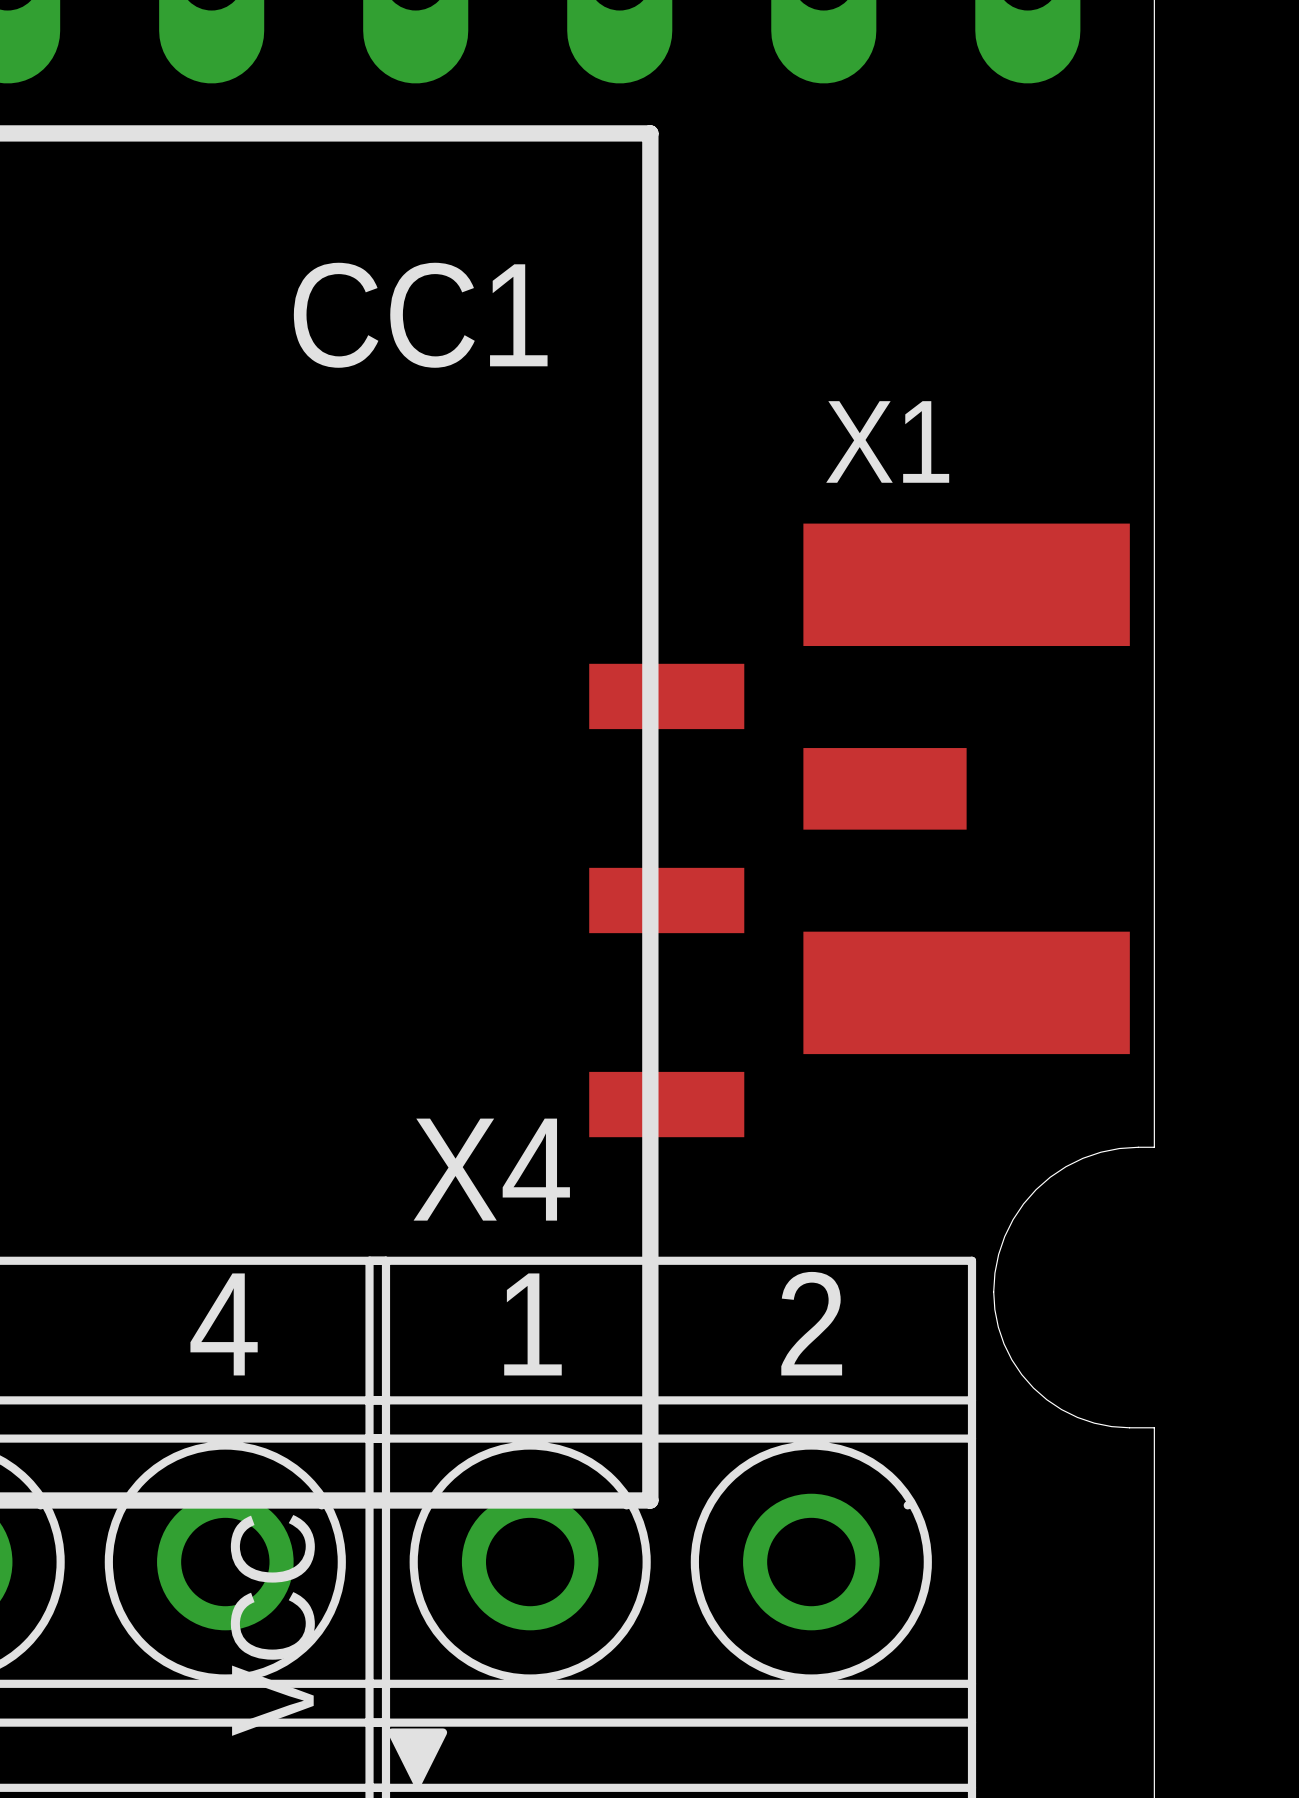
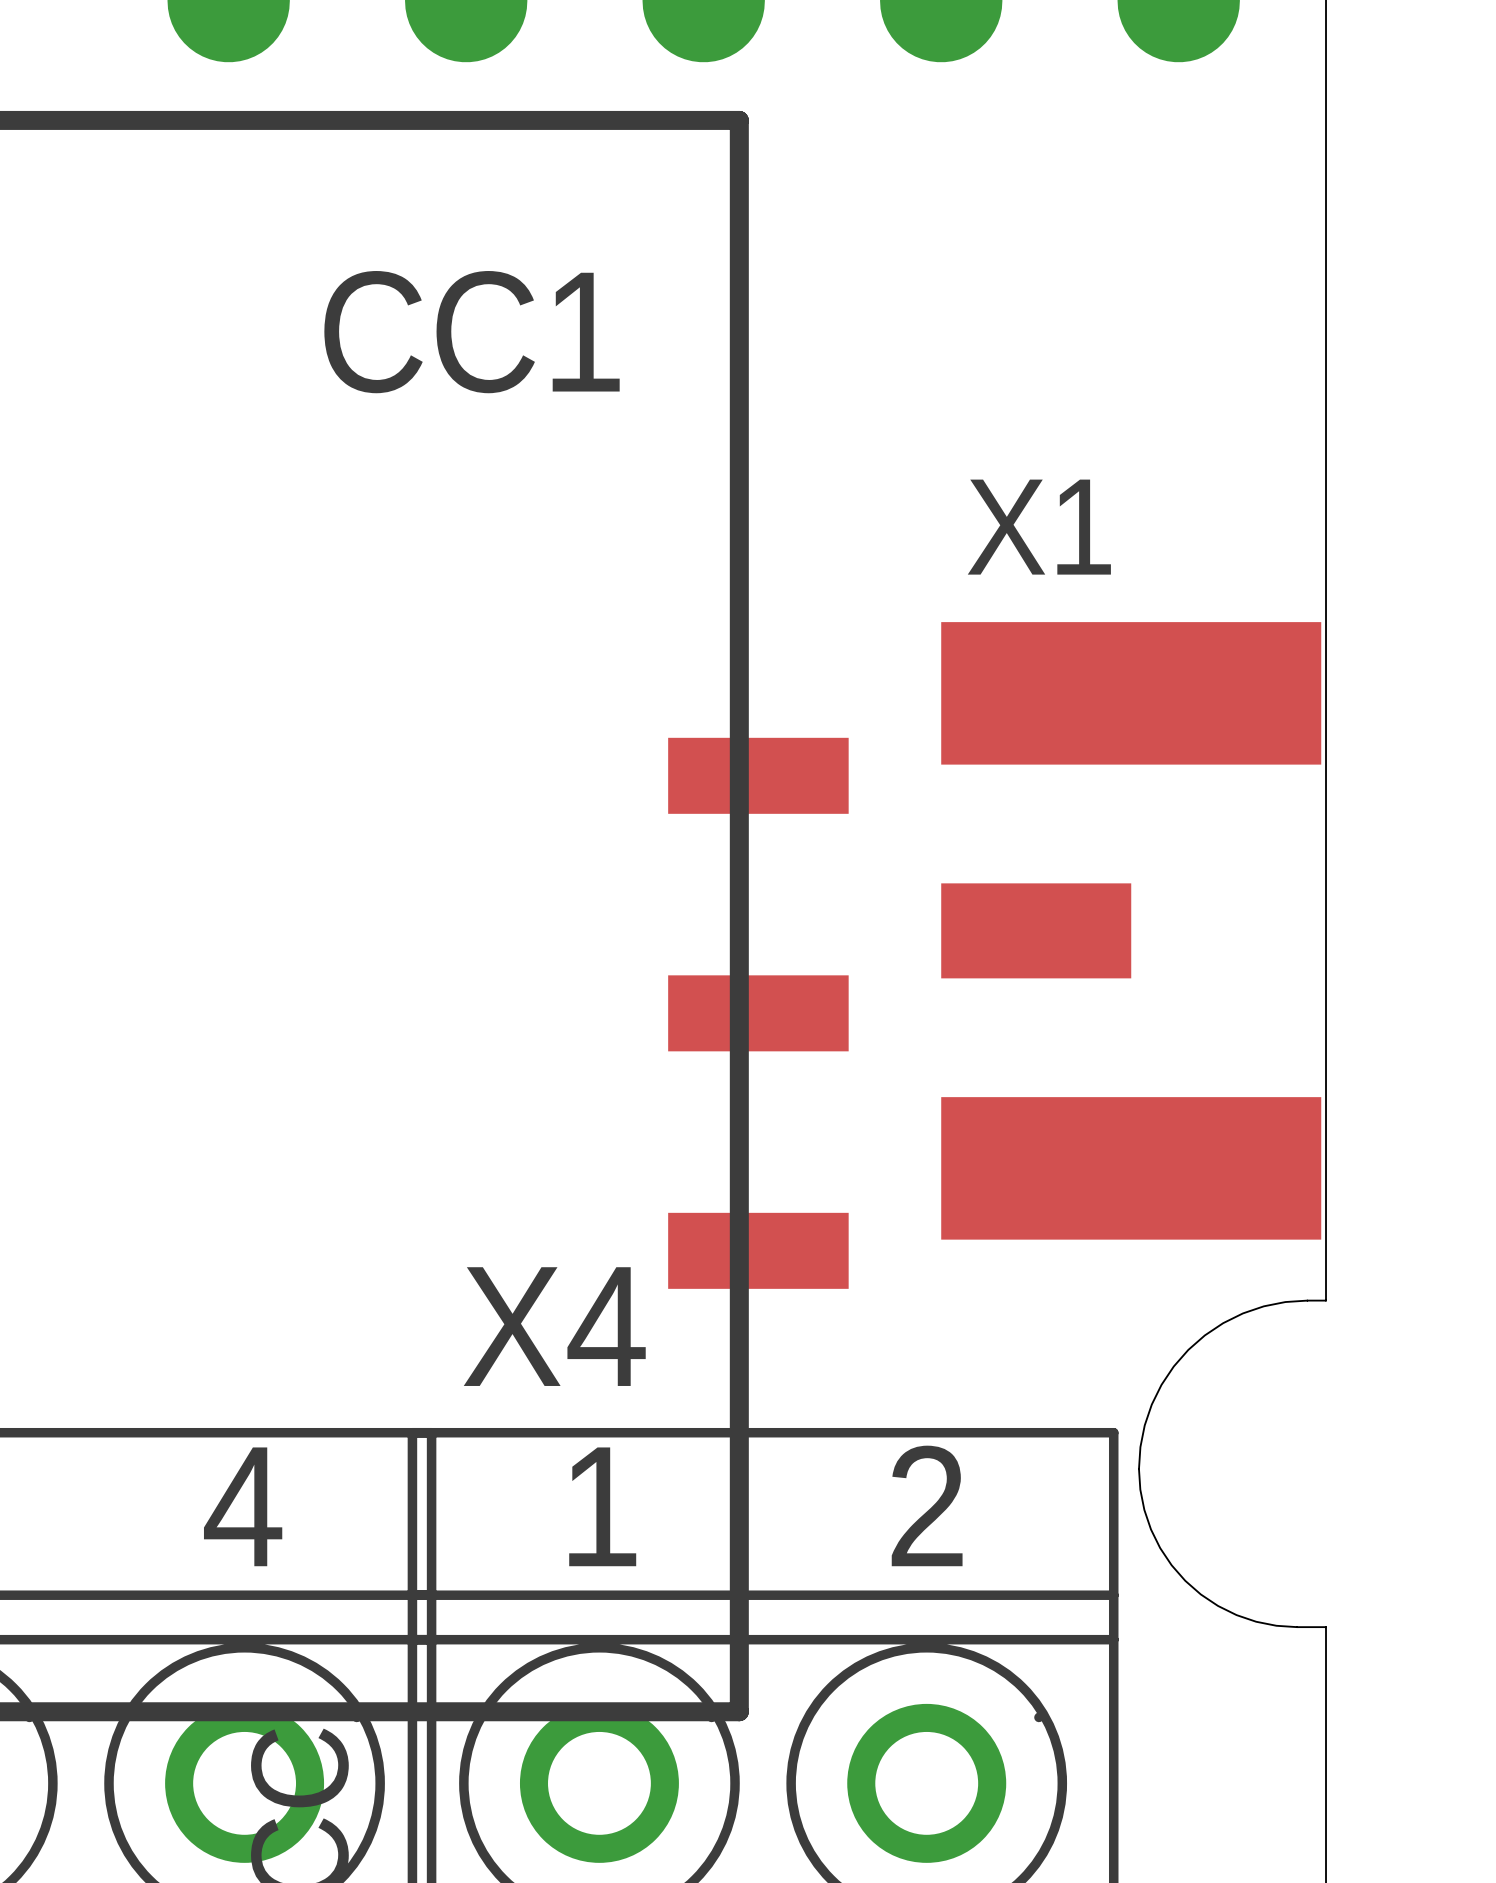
X1 position: (966, 788) -> (1131, 930)

